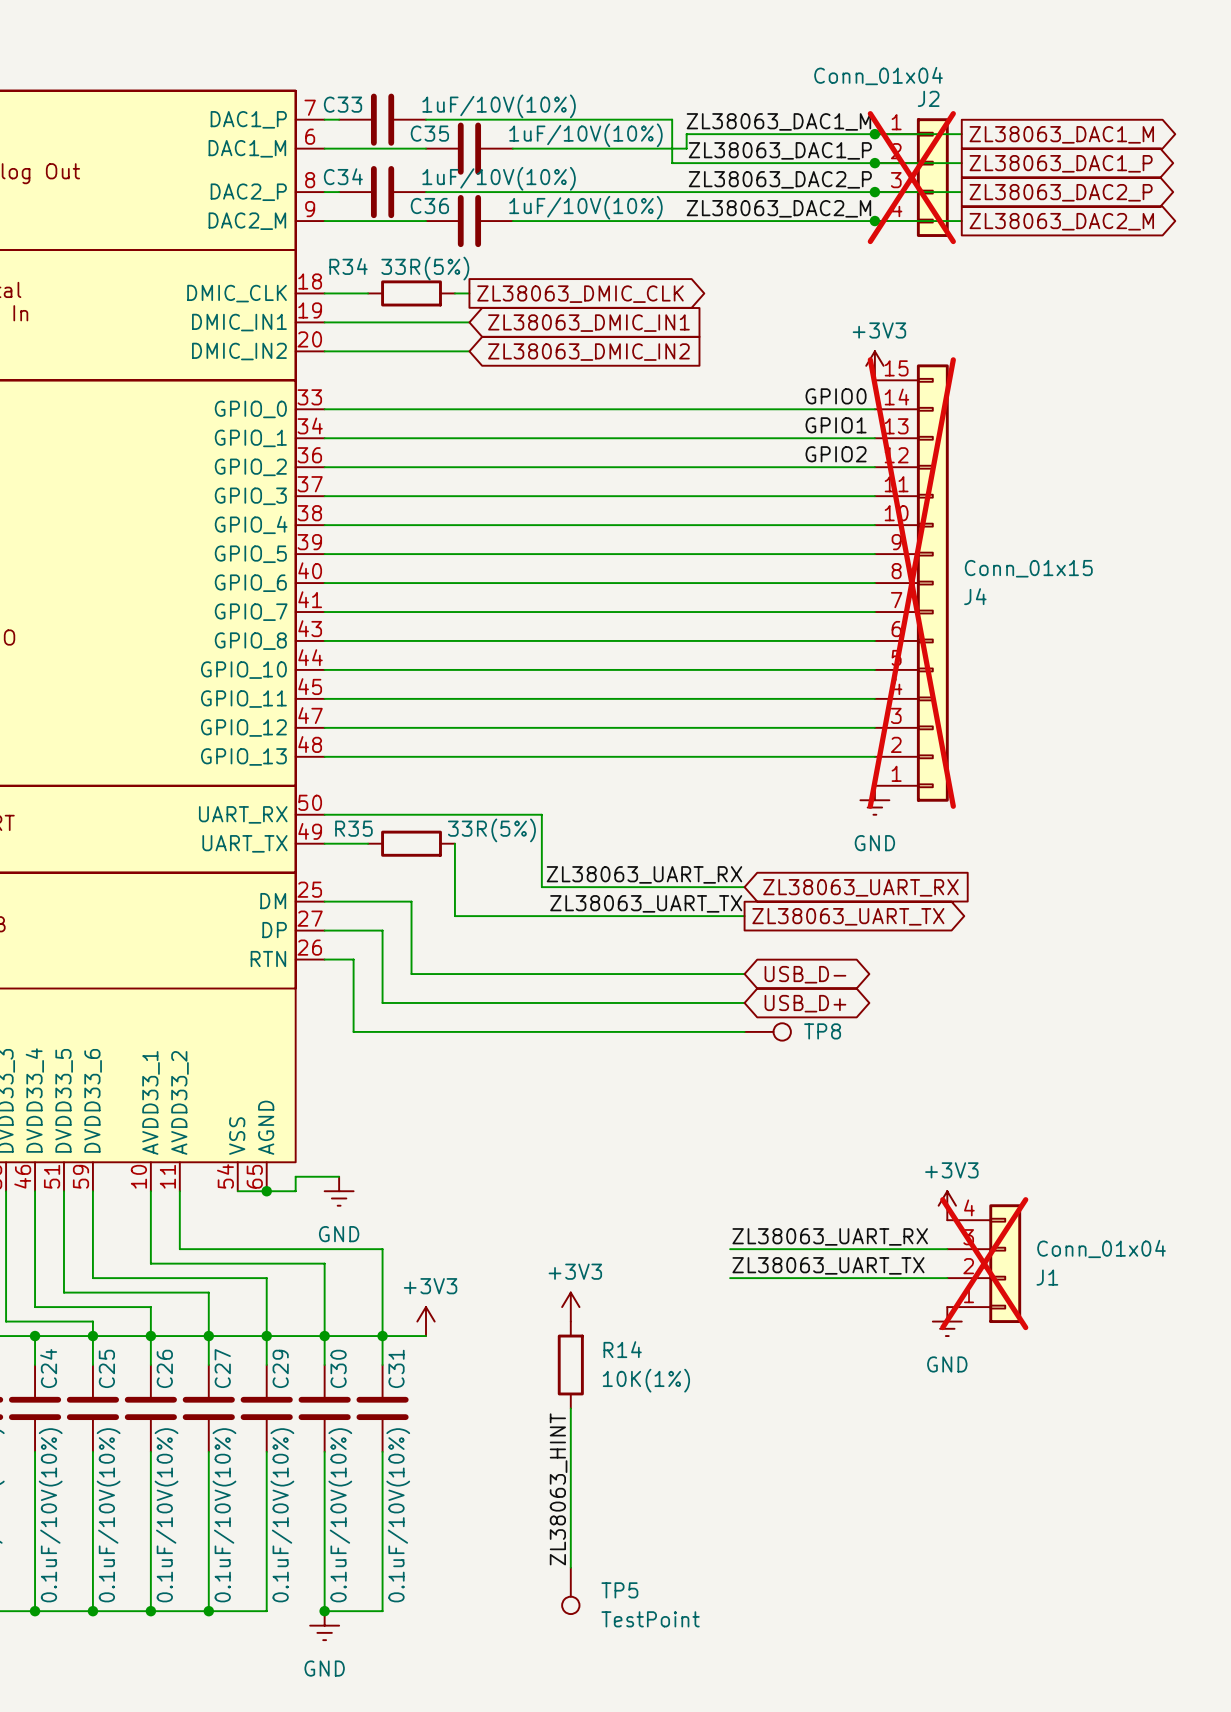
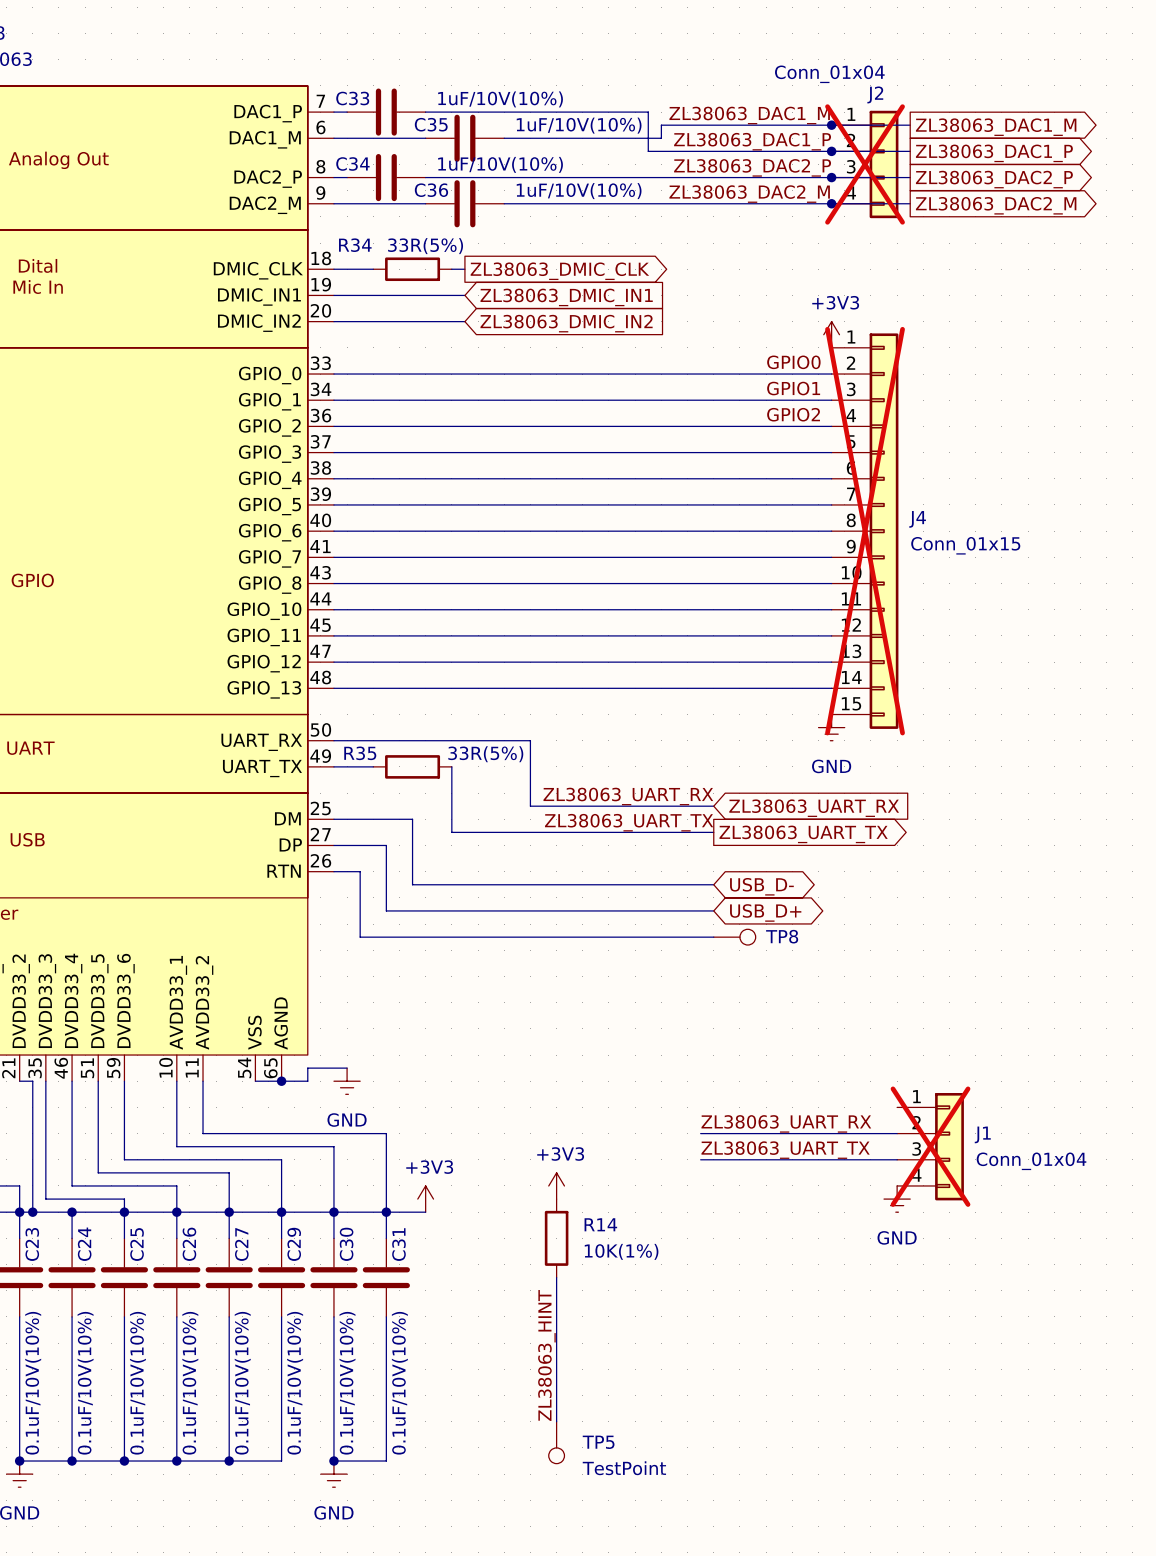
J4 flip: as is (932, 583) -> up-down (884, 531)
power symbol: +3V3 (947, 1205) -> none
J1 flip: as is (1005, 1263) -> up-down (949, 1146)

